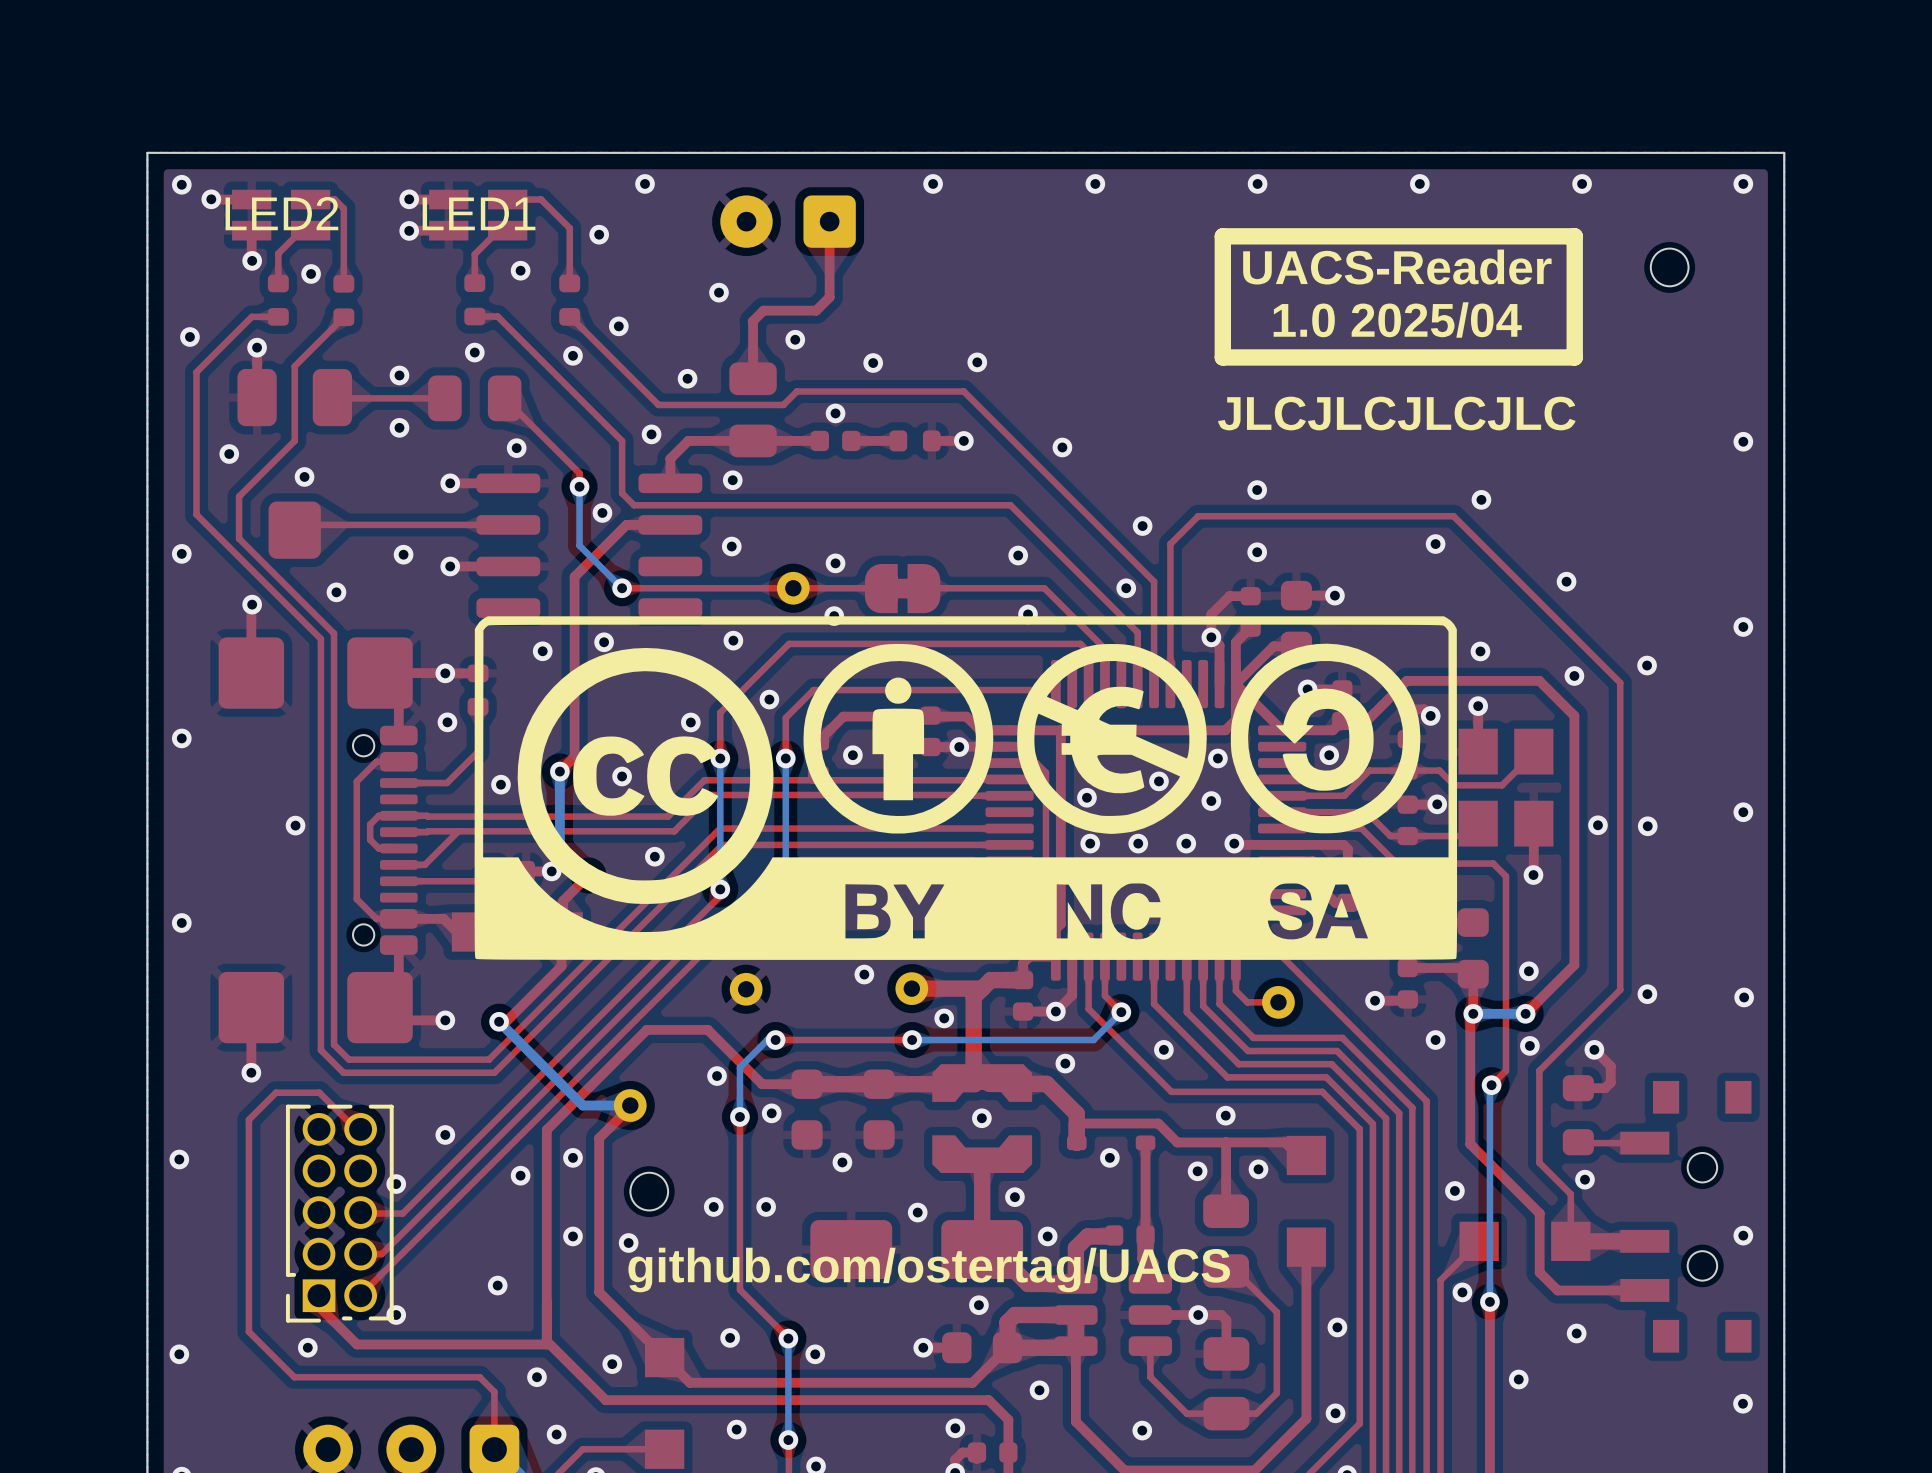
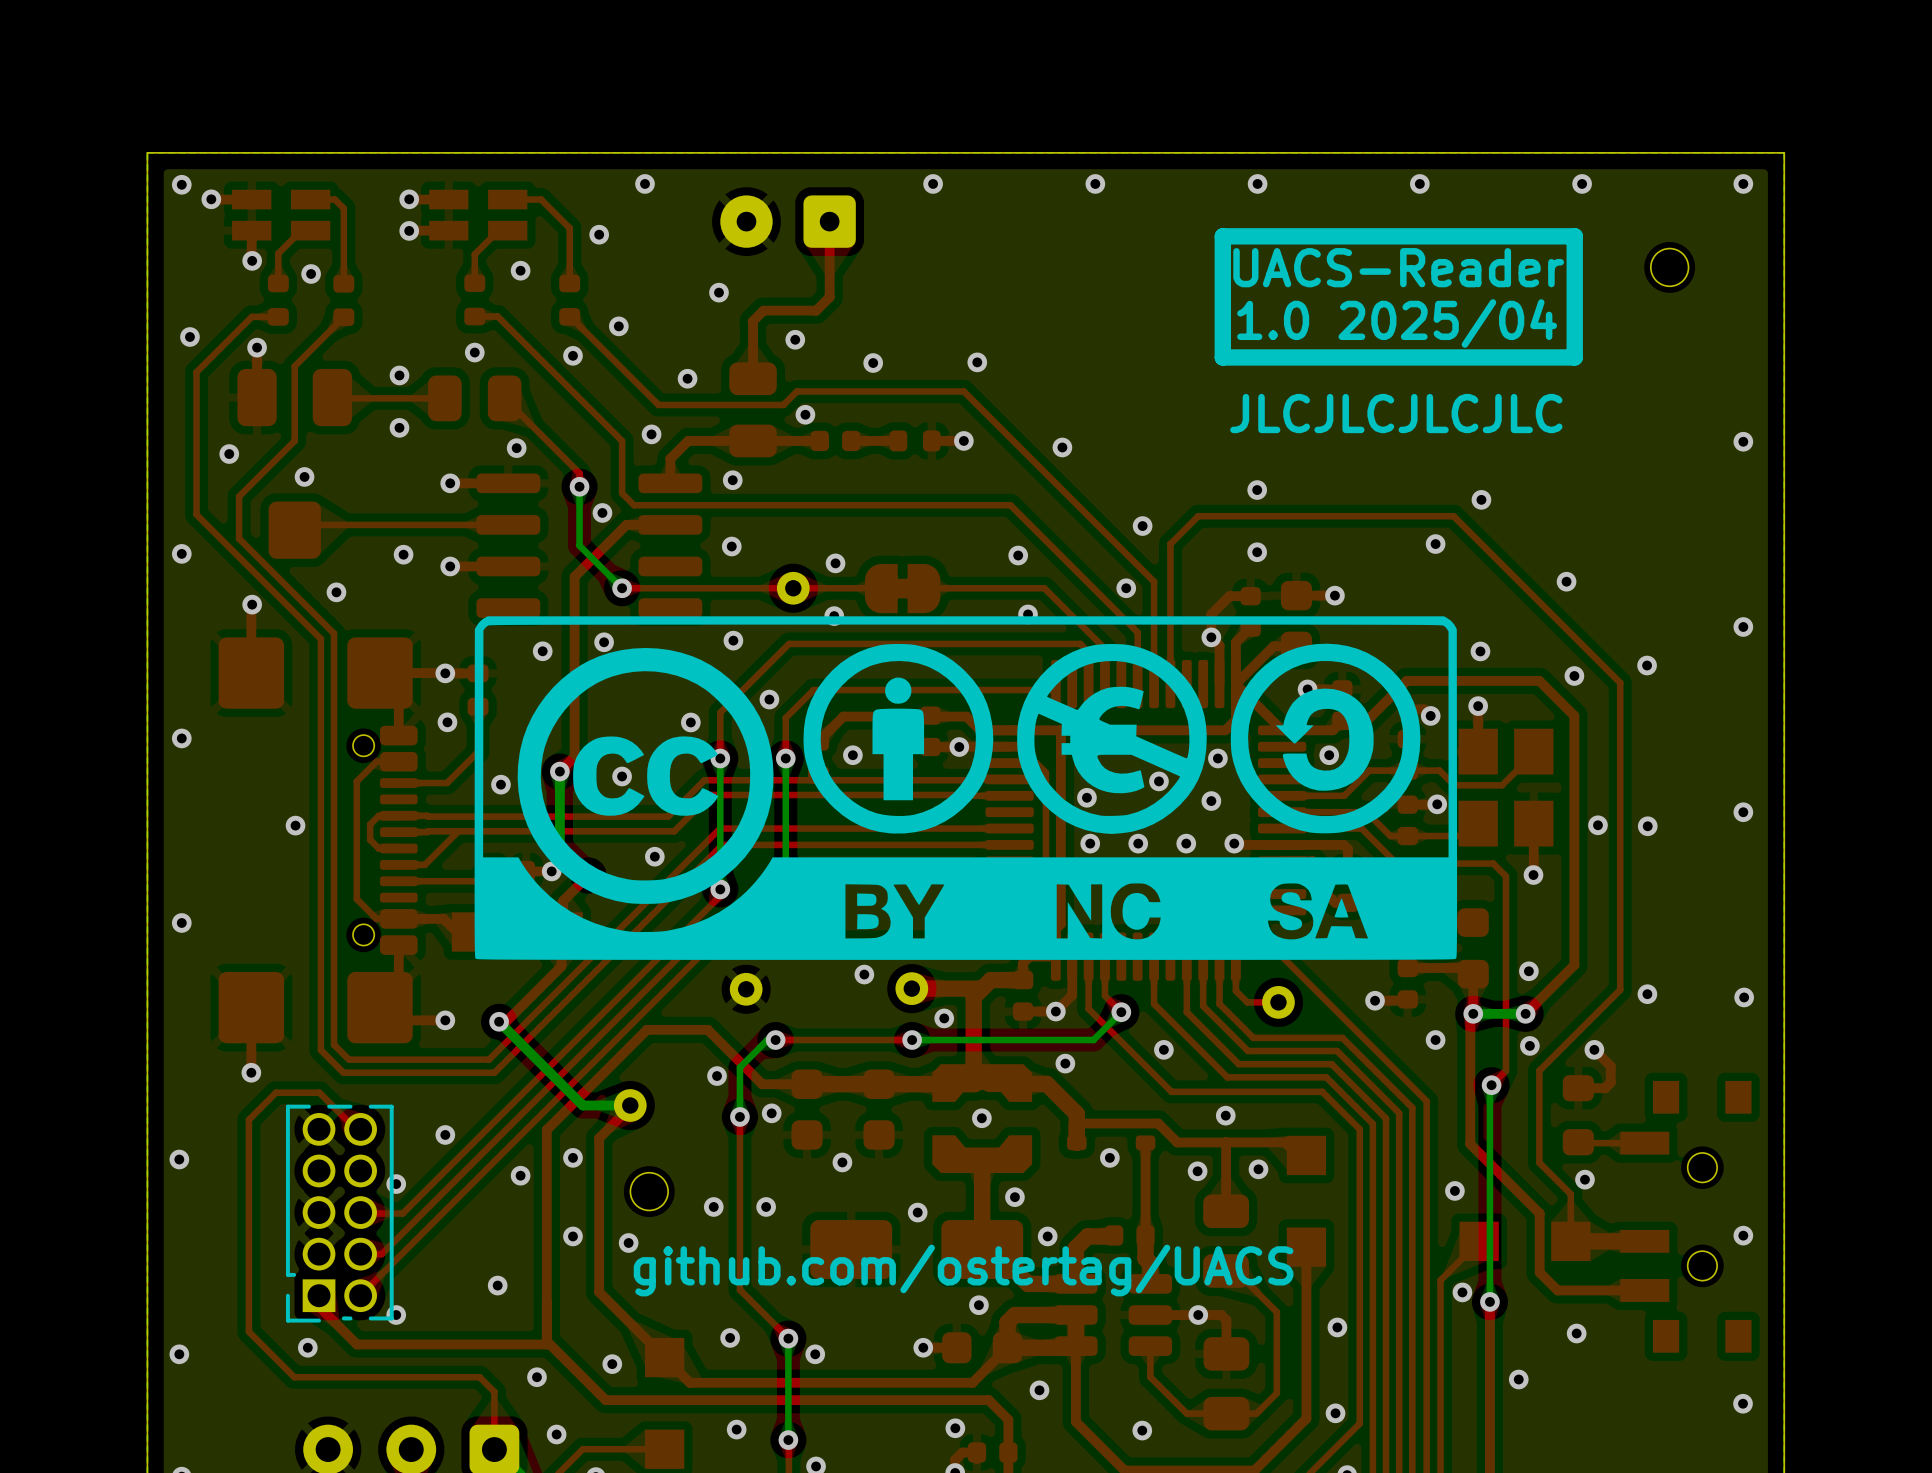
LED2 name: LED2 (281, 213) -> none
LED1 name: LED1 (479, 213) -> none
via position: (835, 413) -> (805, 414)

